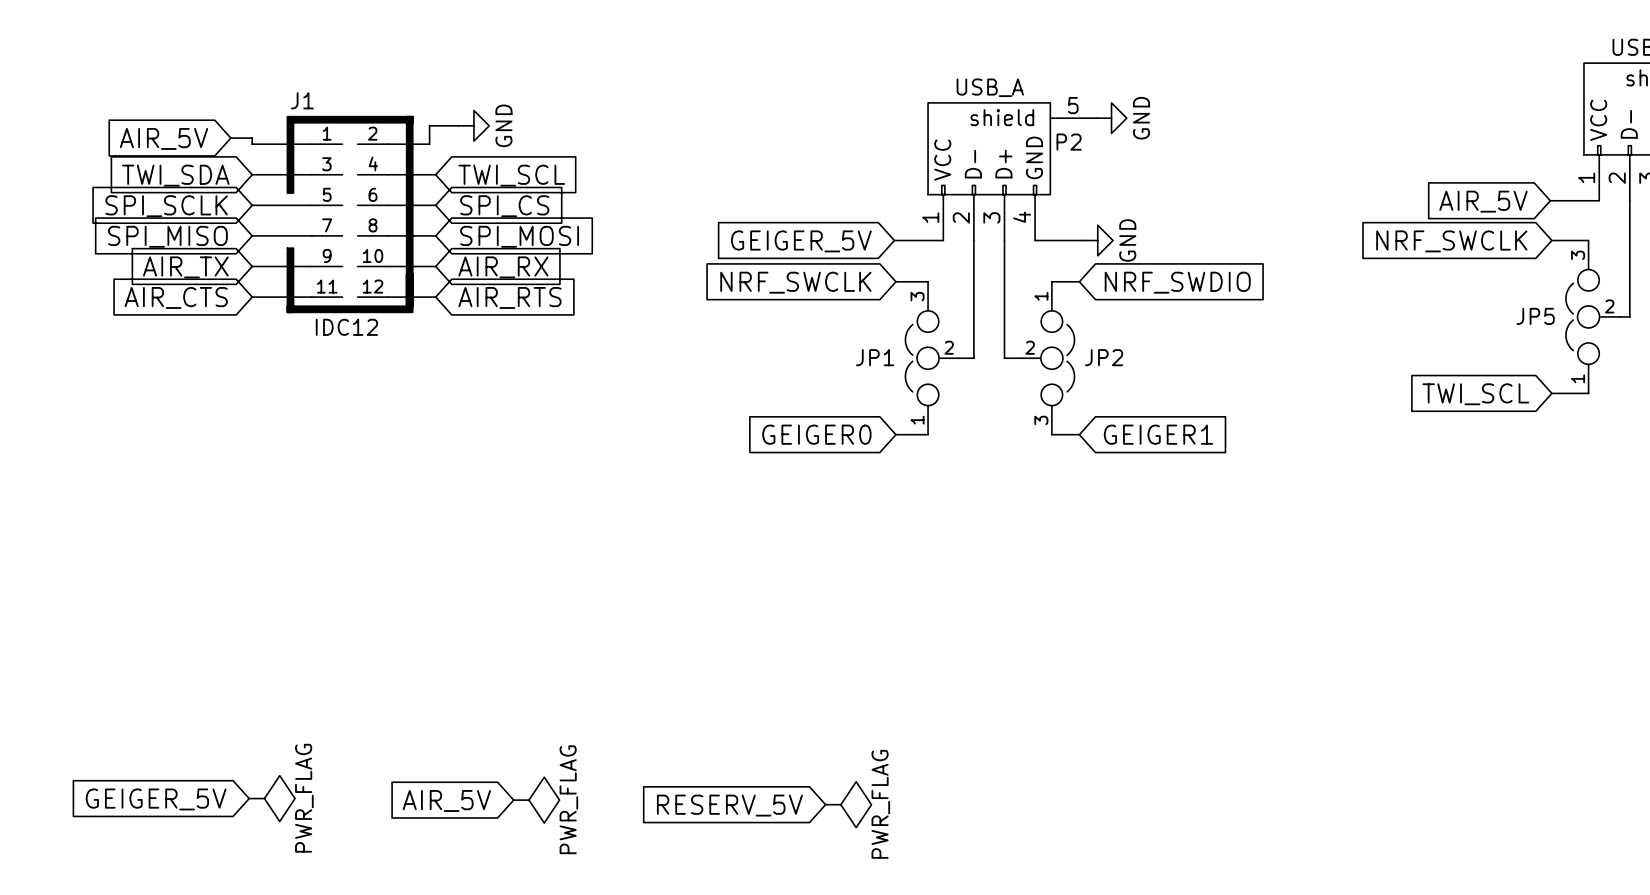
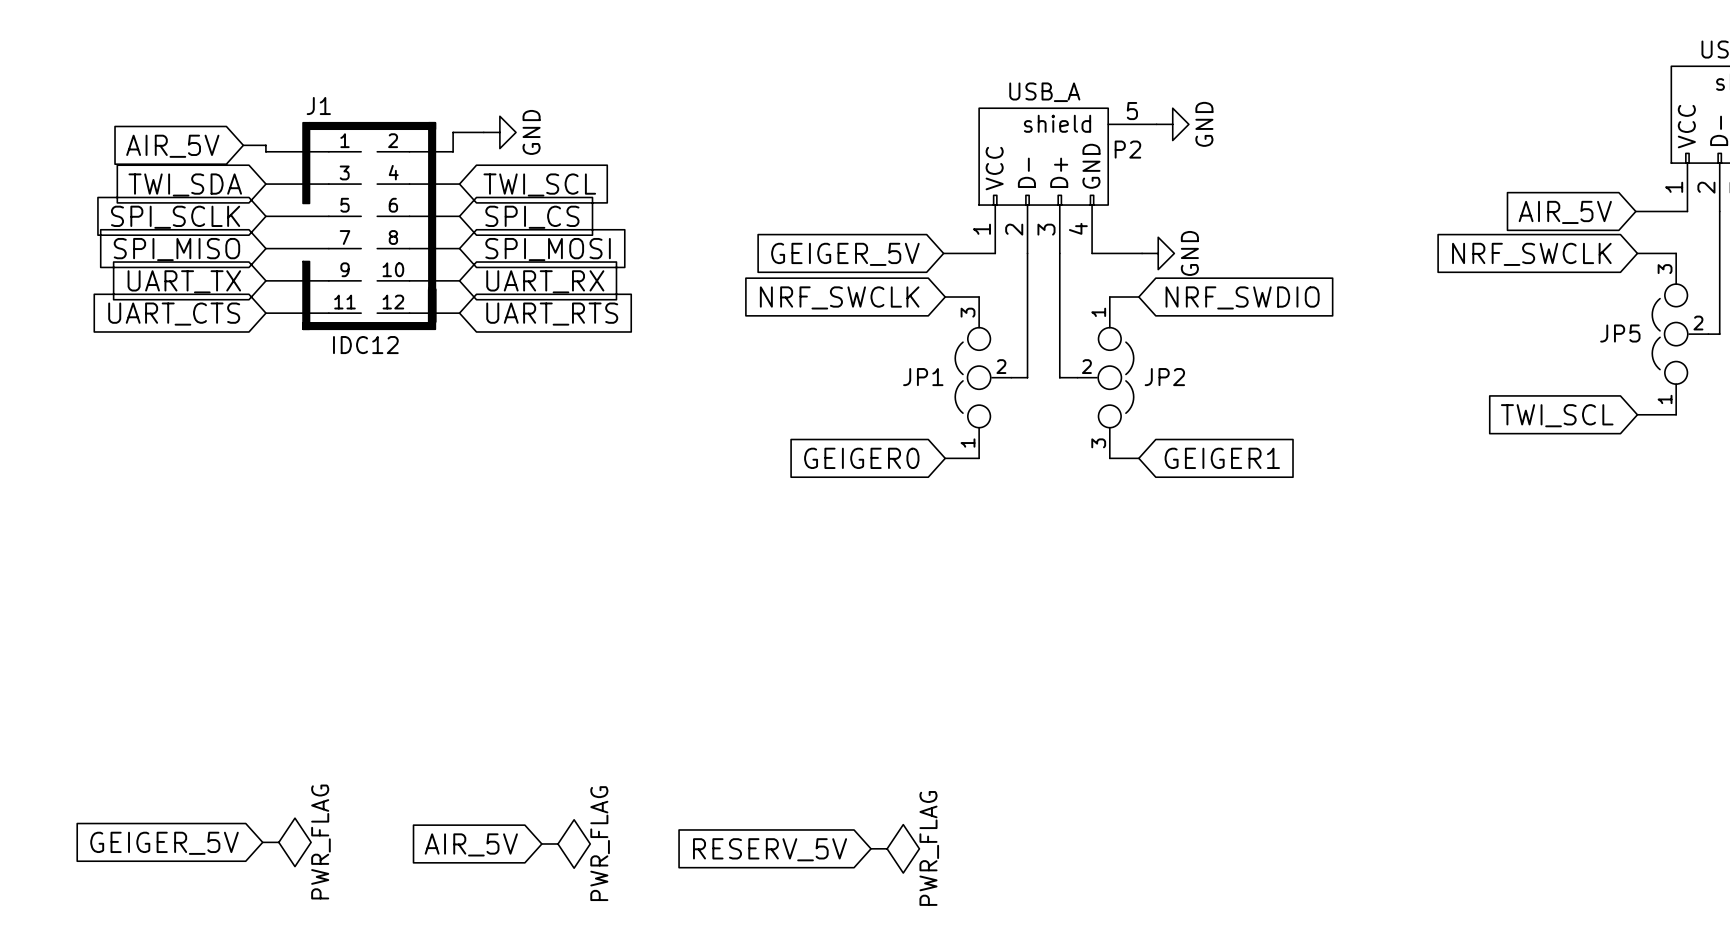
global label: AIR_TX (185, 267) -> UART_TX (184, 281)
global label: AIR_RX (503, 267) -> UART_RX (545, 281)
global label: AIR_CTS (176, 297) -> UART_CTS (174, 314)
global label: AIR_RTS (509, 297) -> UART_RTS (552, 314)

